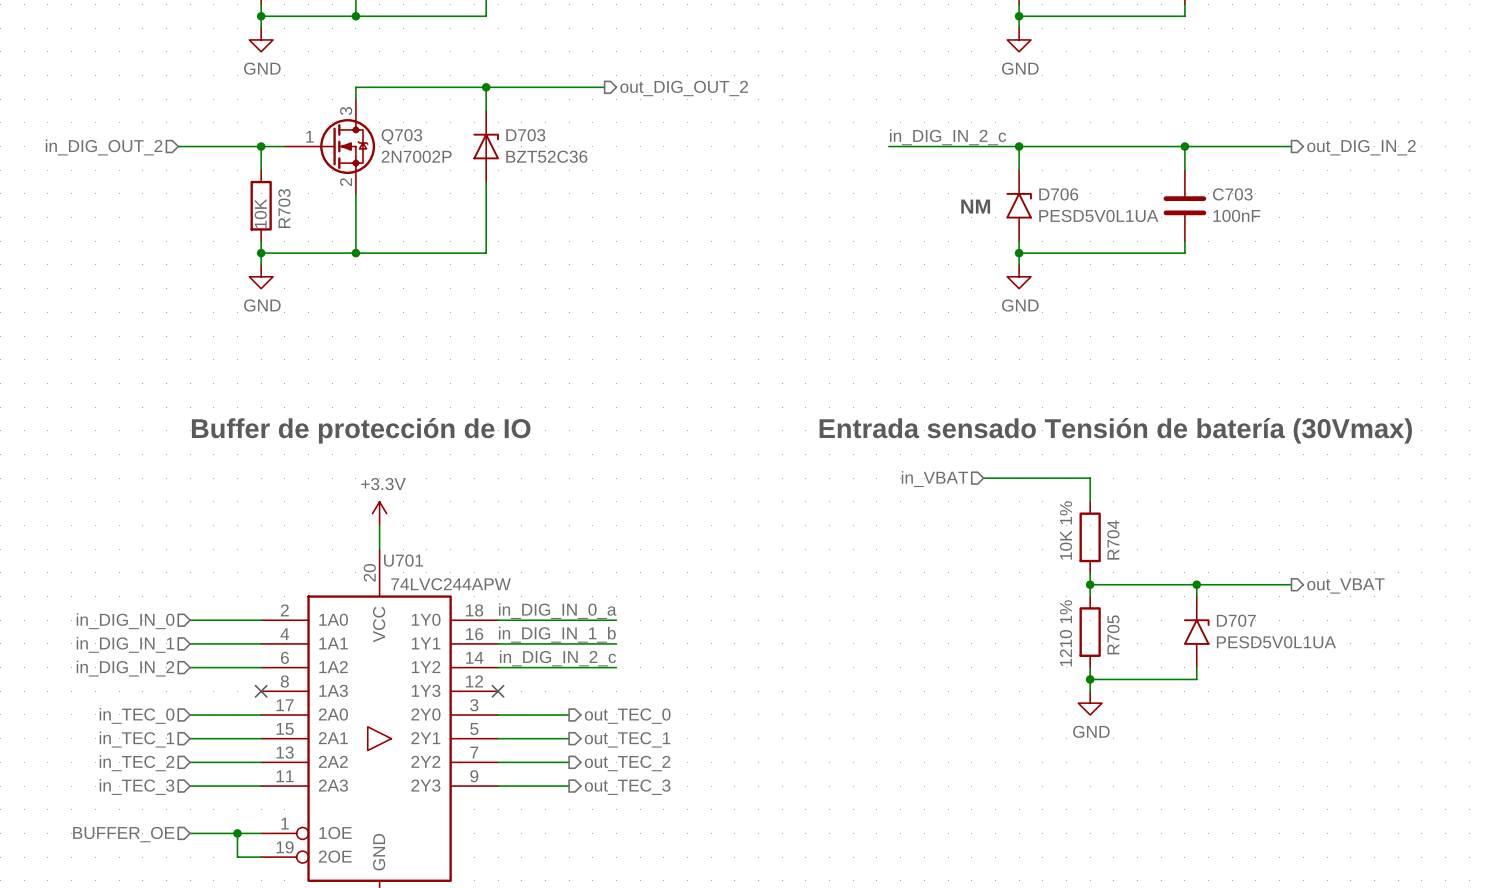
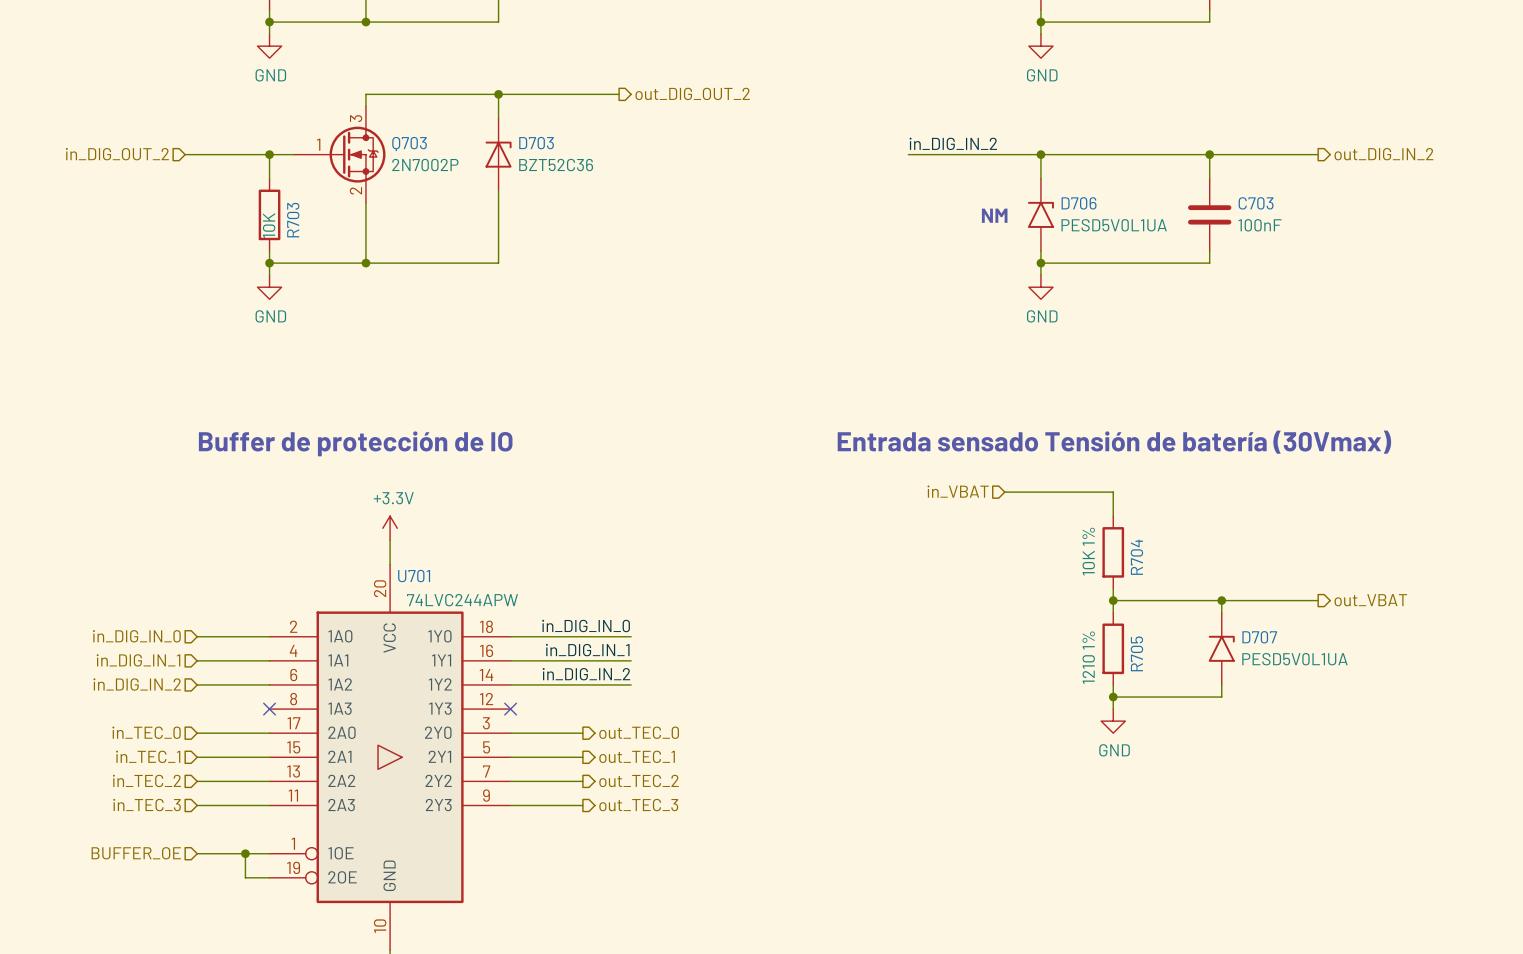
label: in_DIG_IN_2_c (948, 137) -> in_DIG_IN_2 (953, 143)
label: in_DIG_IN_0_a (557, 611) -> in_DIG_IN_0 (586, 626)
label: in_DIG_IN_1_b (557, 634) -> in_DIG_IN_1 (587, 650)
label: in_DIG_IN_2_c (557, 658) -> in_DIG_IN_2 (586, 674)

